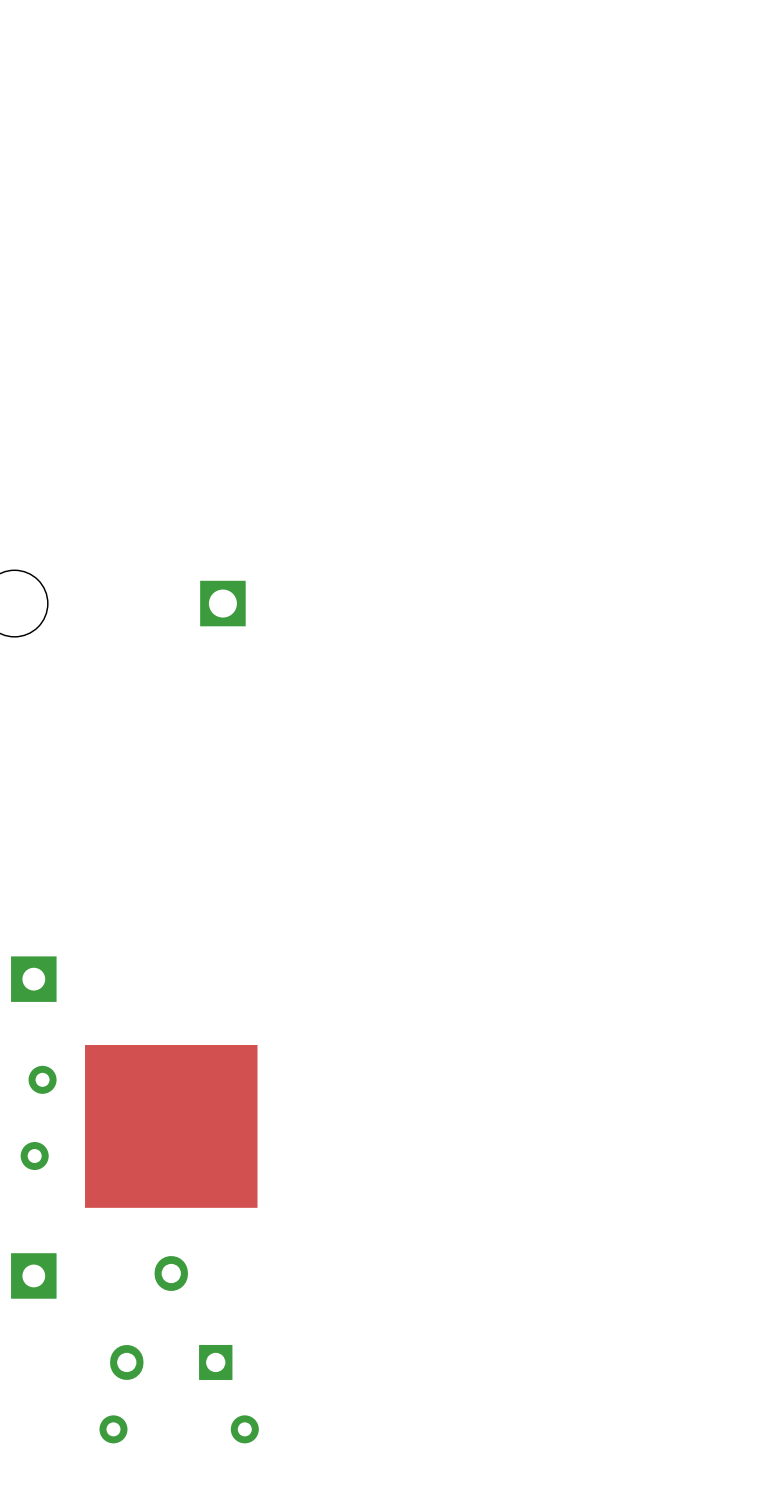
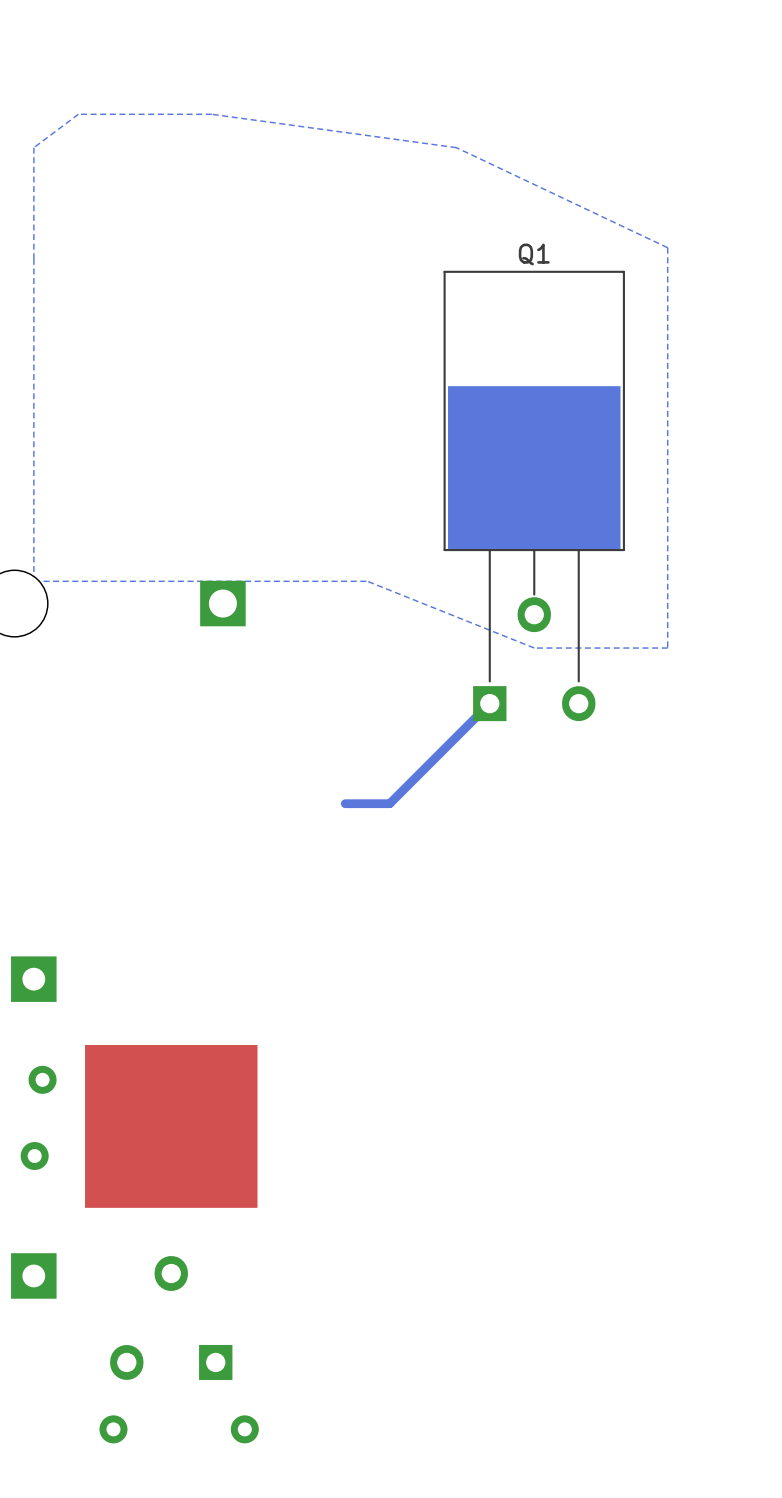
bottom zone outline: none -> (211, 114) (456, 147) (667, 247) (667, 648) (534, 648) (367, 581) (33, 581) (33, 147) (78, 114) (211, 114)
Q1: none -> (534, 495)
bottom track: none -> (489, 703) (389, 803) (345, 803)

